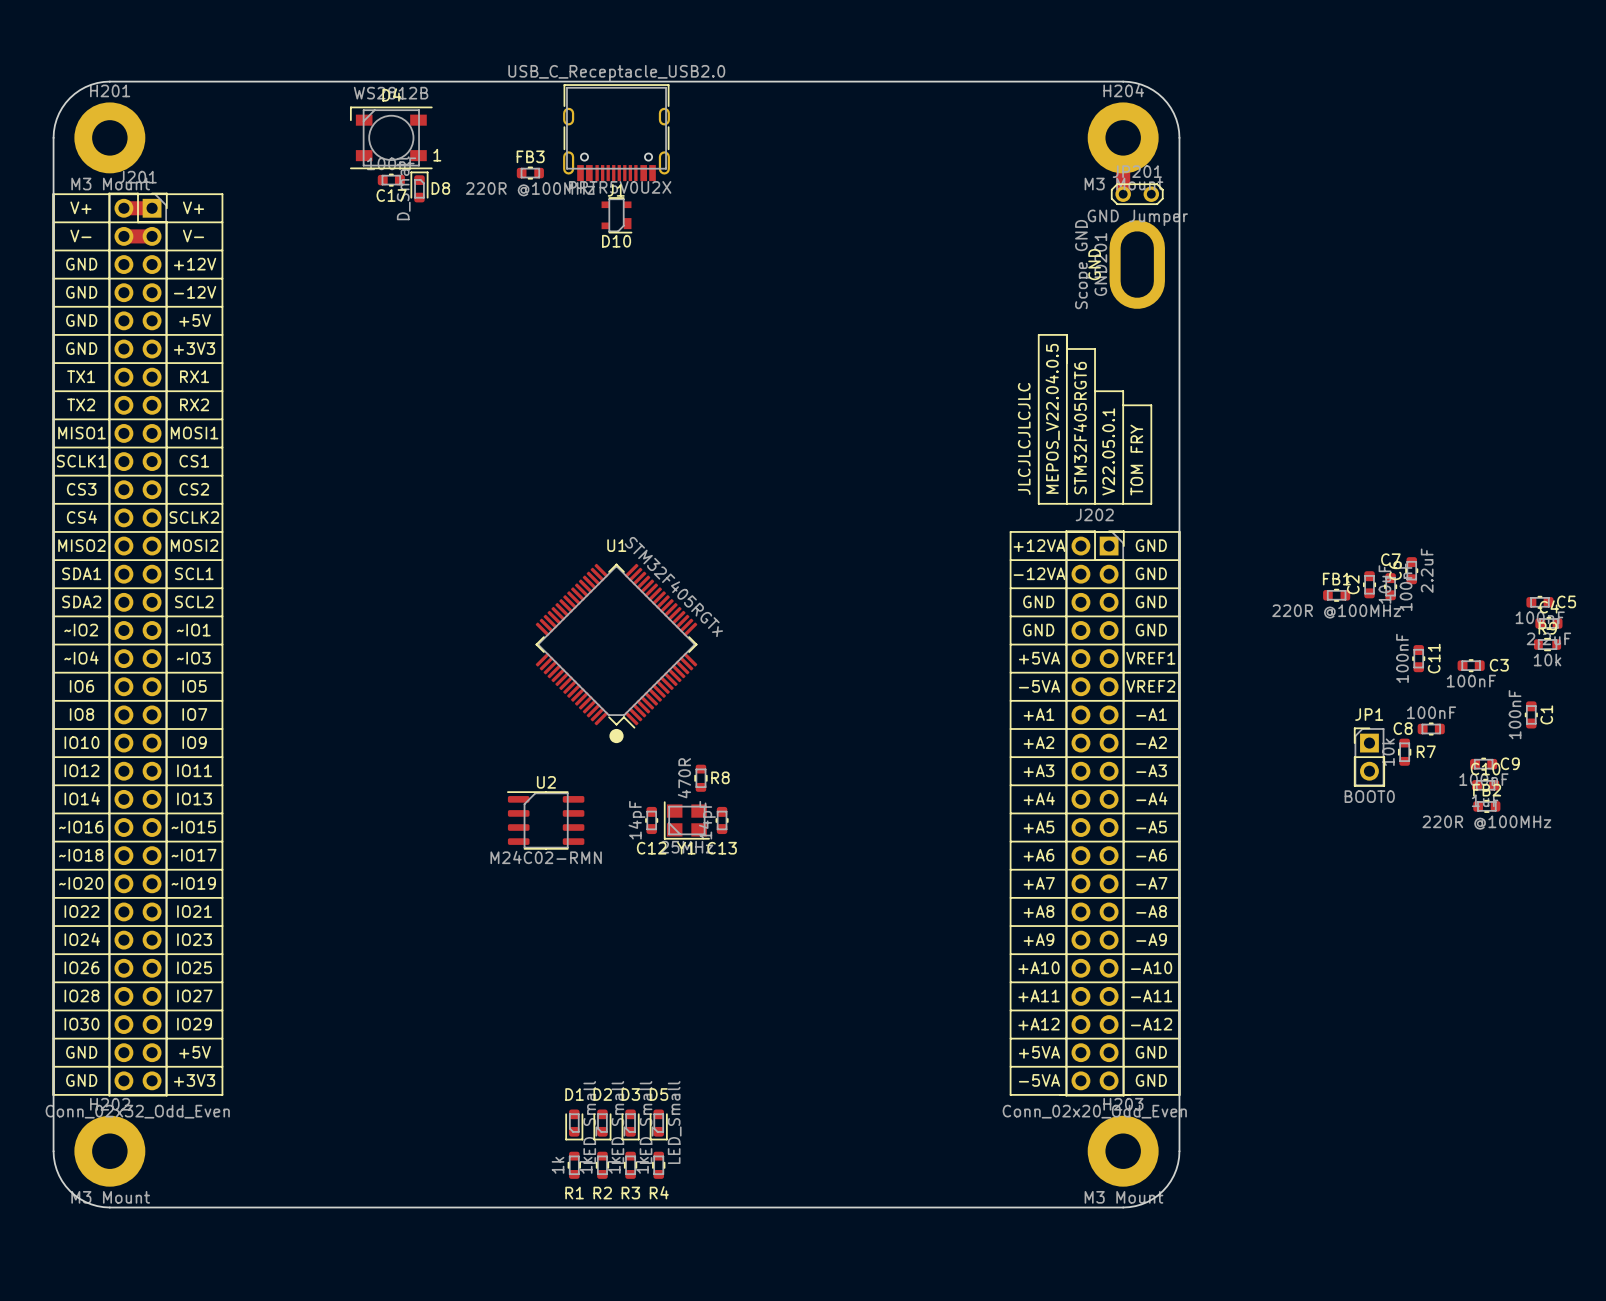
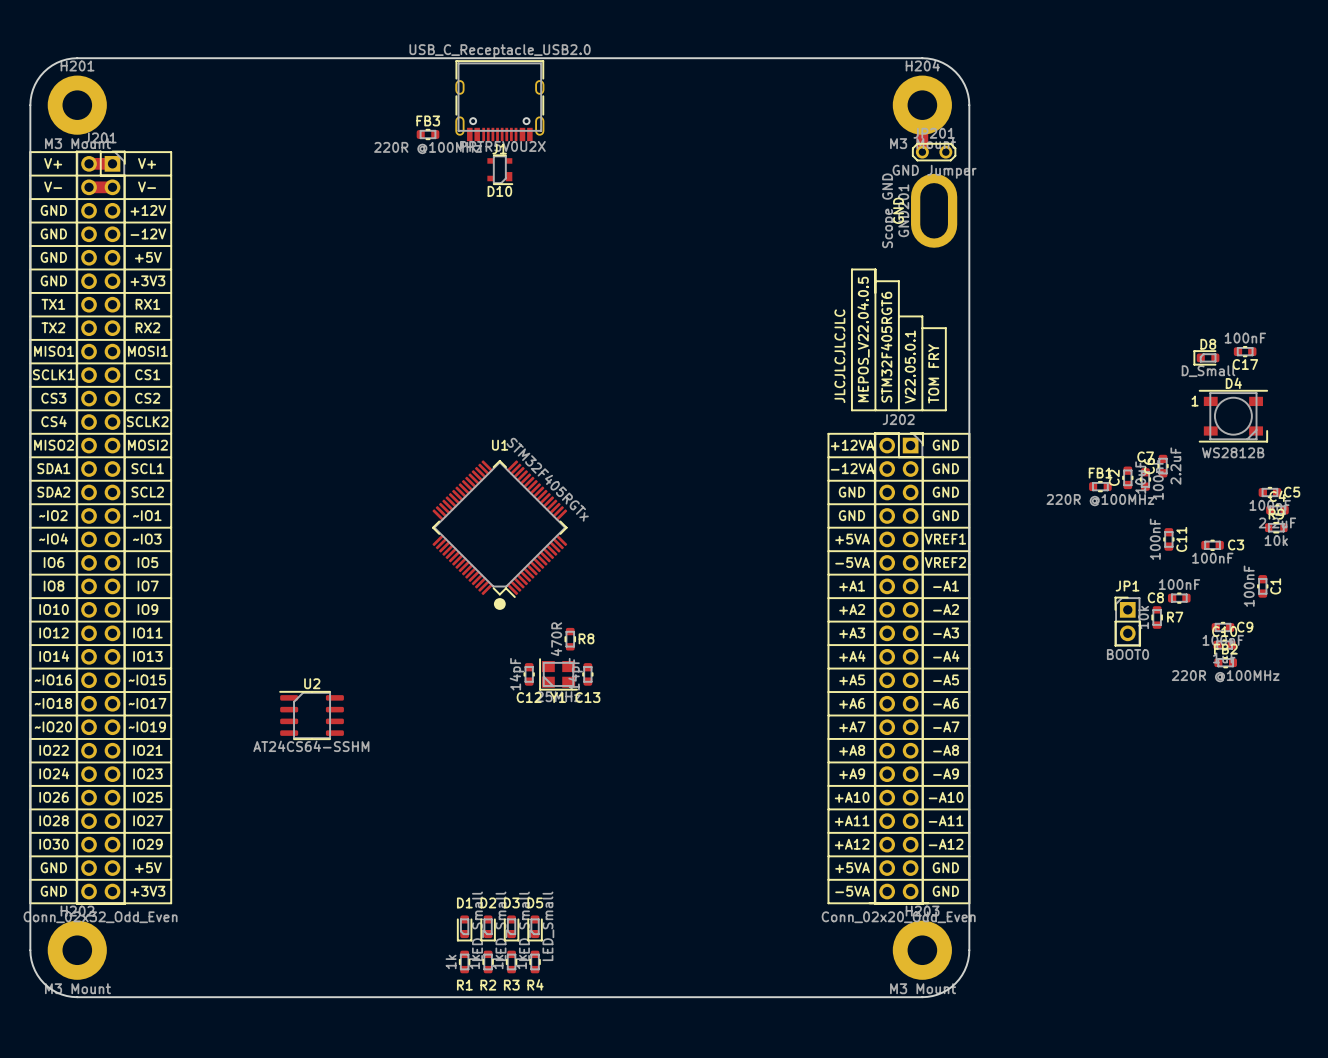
D4 rotation: 0° (391, 137) -> 180° (1233, 416)
D4 position: (391, 137) -> (1233, 416)
C17 position: (391, 180) -> (1245, 351)
D8 rotation: 0° (419, 187) -> 90° counterclockwise (1206, 357)
D8 position: (419, 187) -> (1206, 357)
U2 position: (545, 820) -> (311, 715)
U2 value: M24C02-RMN (546, 857) -> AT24CS64-SSHM (311, 746)

